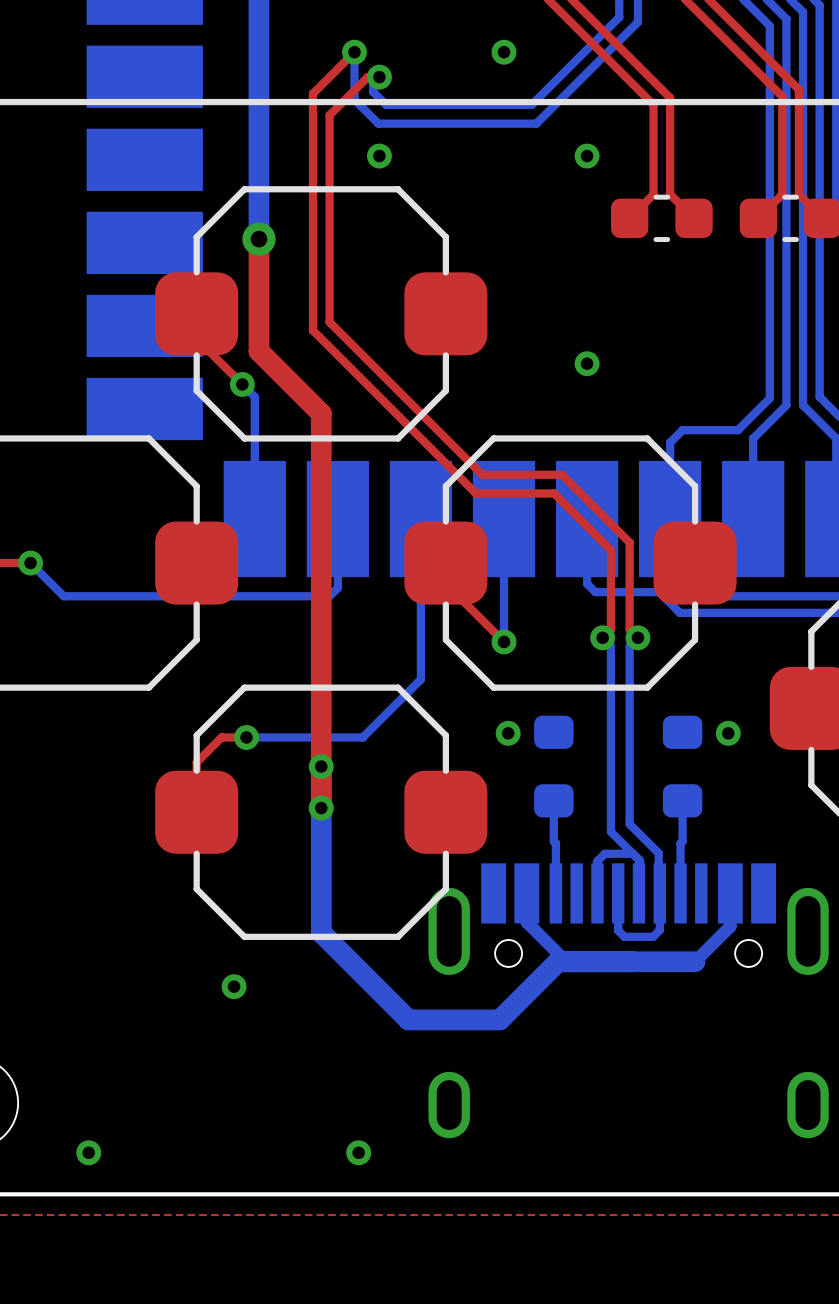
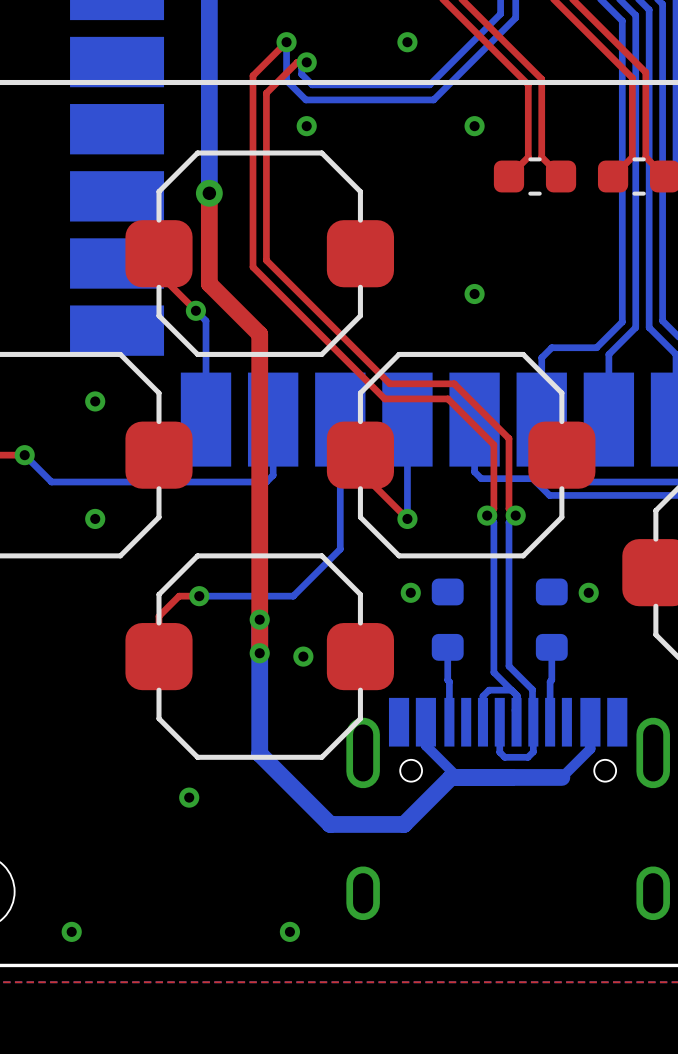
via: none -> (95, 401)
via: none -> (95, 518)
via: none -> (303, 656)

